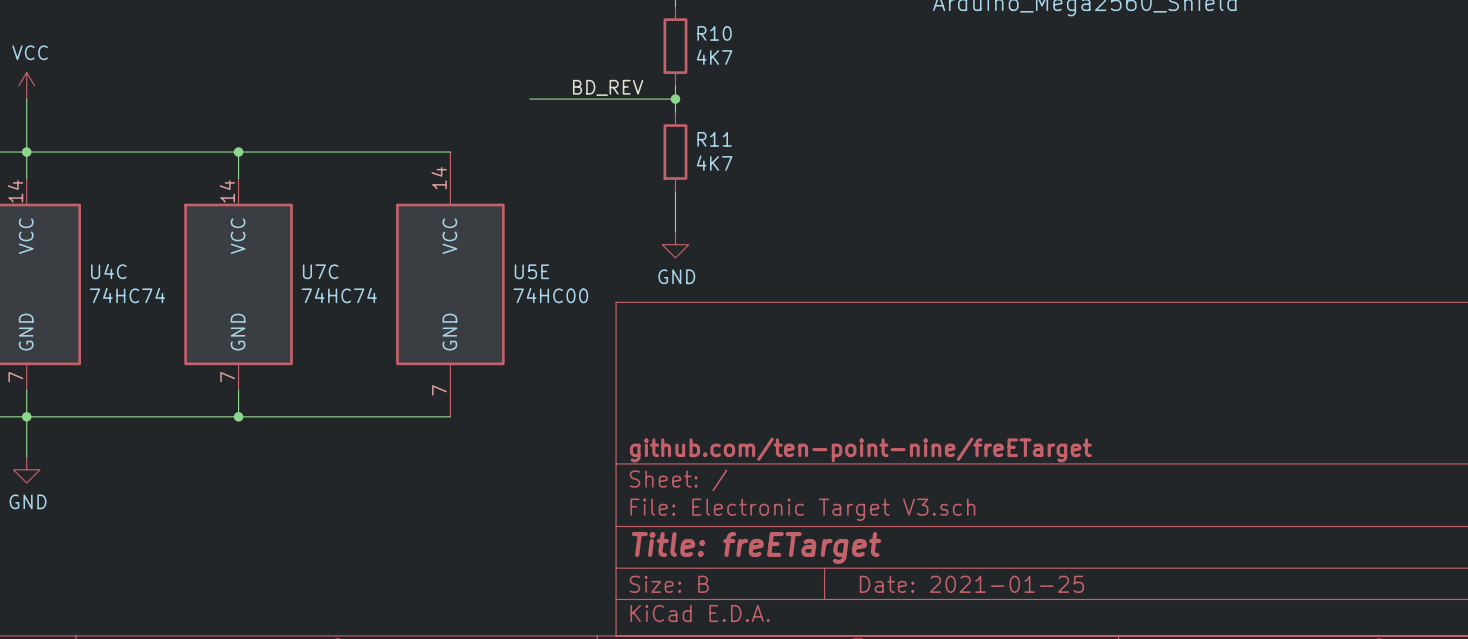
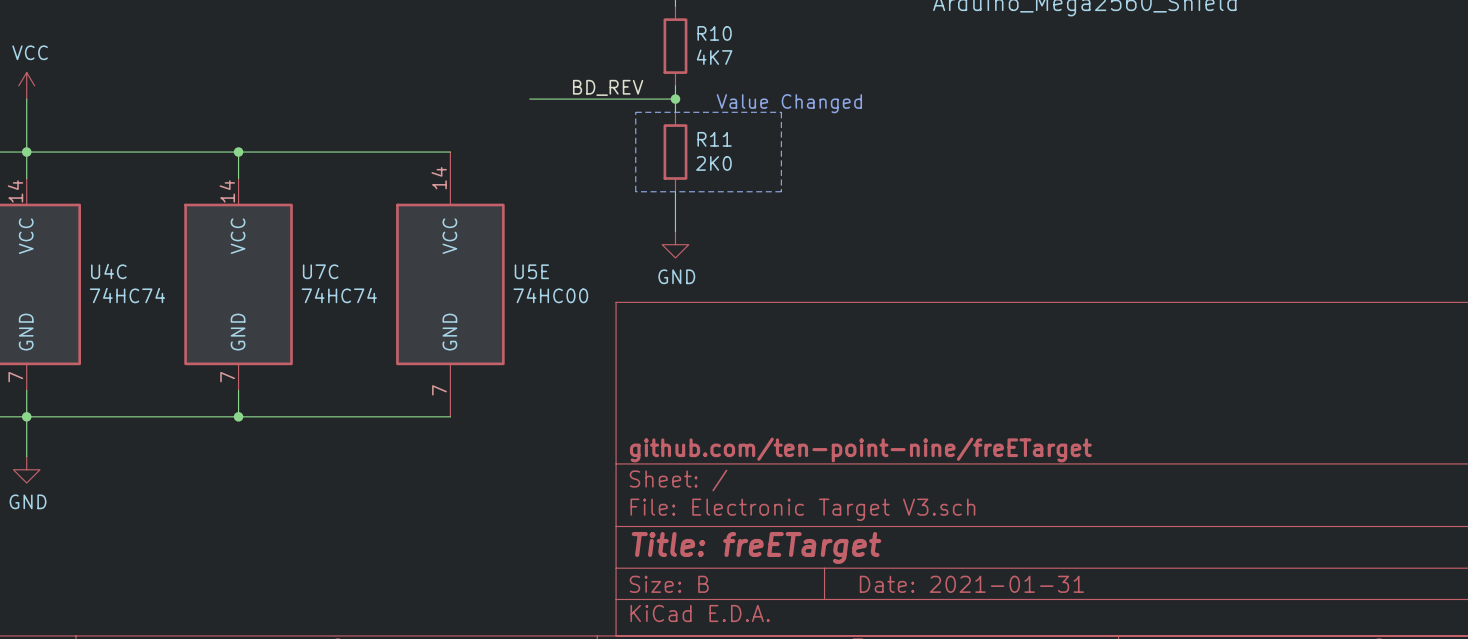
text: none -> Value Changed (789, 103)
line: none -> (635, 112) (781, 112) (781, 191) (635, 191) (635, 112)
R11 value: 4K7 (714, 163) -> 2K0 (713, 163)
title block: Date: 2021-01-25 (971, 584) -> Date: 2021-01-31 (971, 584)

